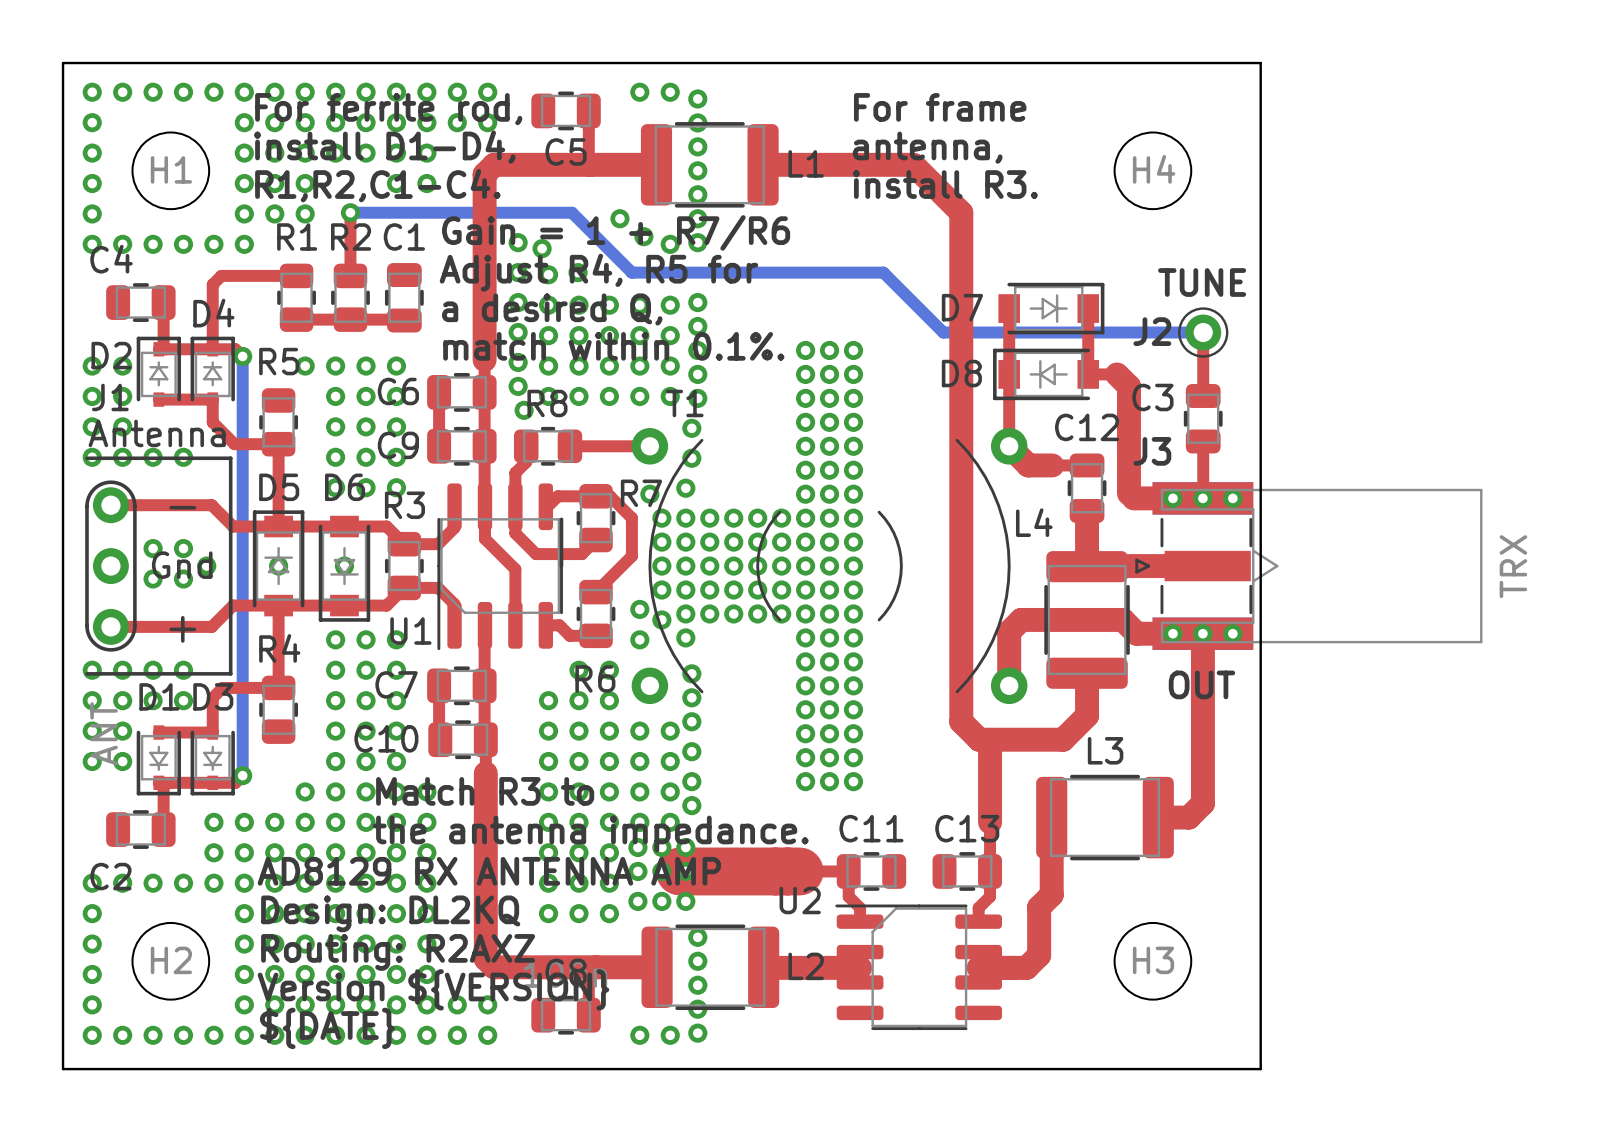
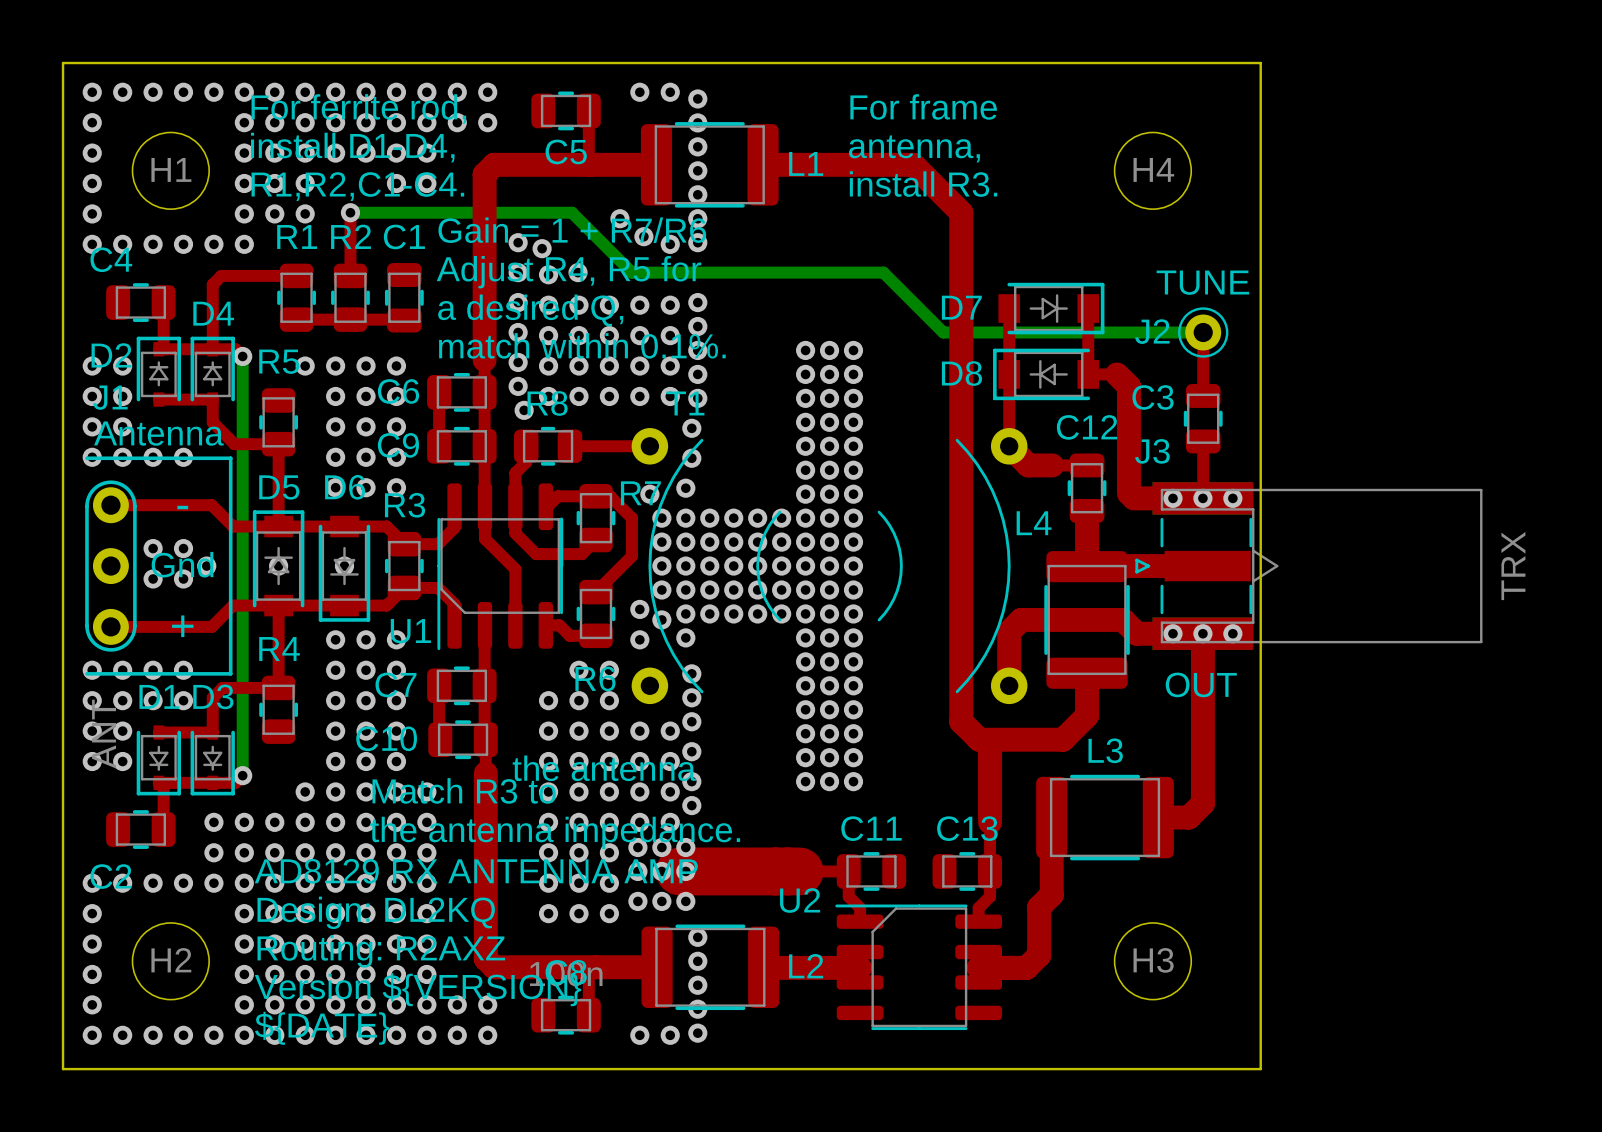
text: none -> the antenna (604, 768)

